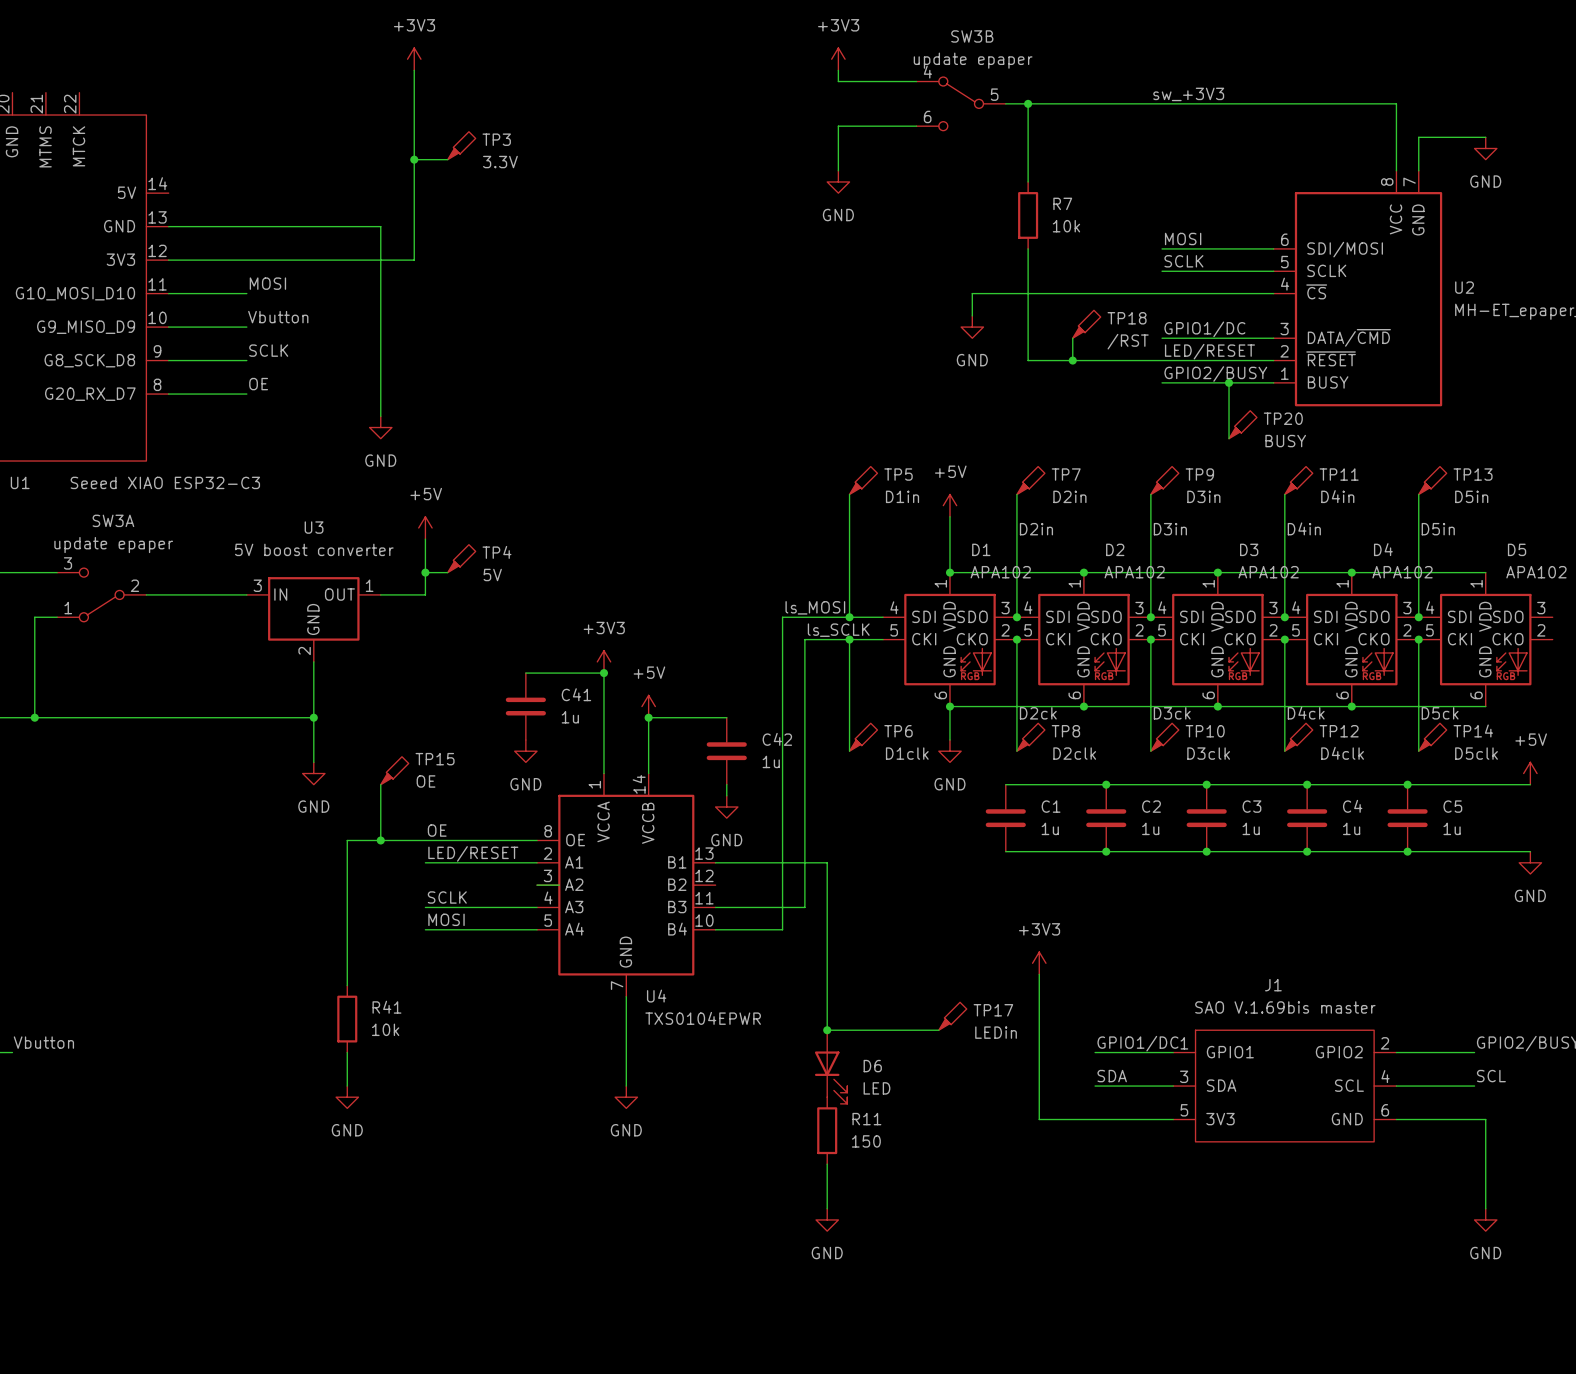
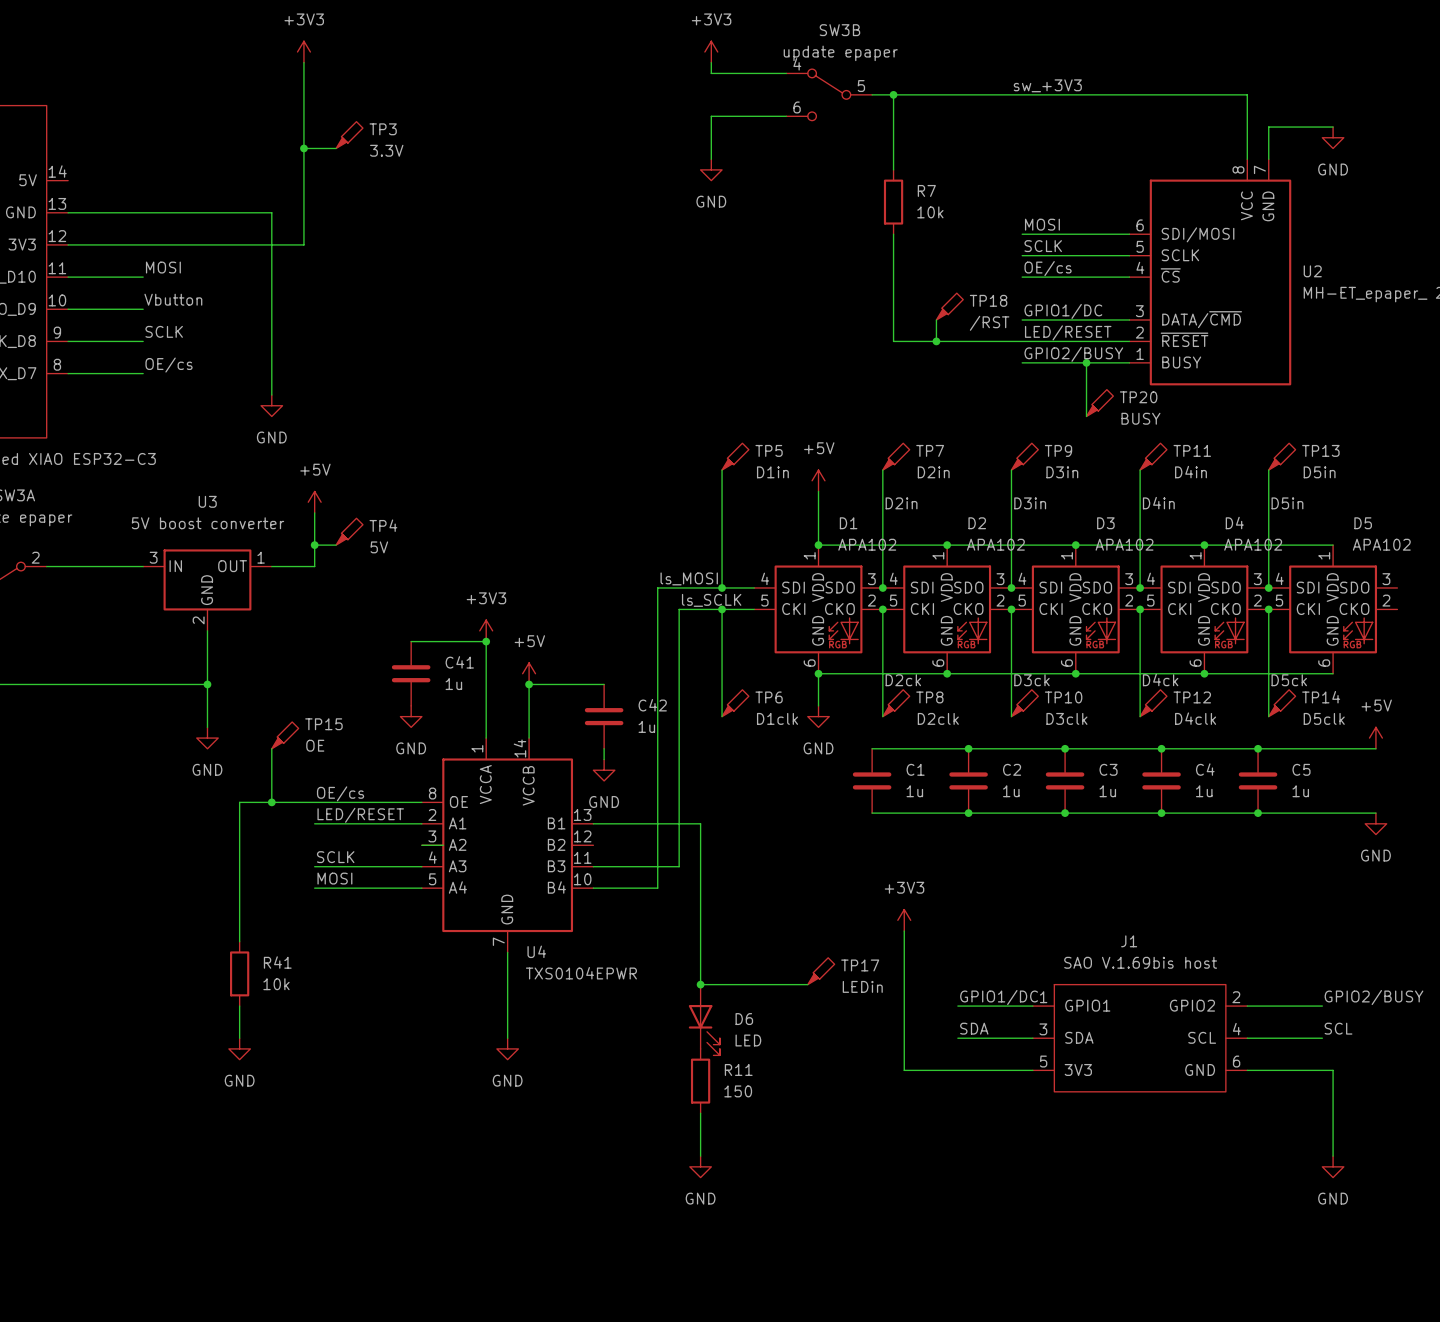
label: none -> OE/cs (1048, 268)
wire: (1162, 293) (972, 293) (972, 315) -> none
power symbol: GND (972, 327) -> none
label: OE (258, 384) -> OE/cs (169, 365)
label: OE (437, 830) -> OE/cs (340, 793)
J1 value: SAO V.1.69bis master (1285, 1007) -> SAO V.1.69bis host (1140, 962)

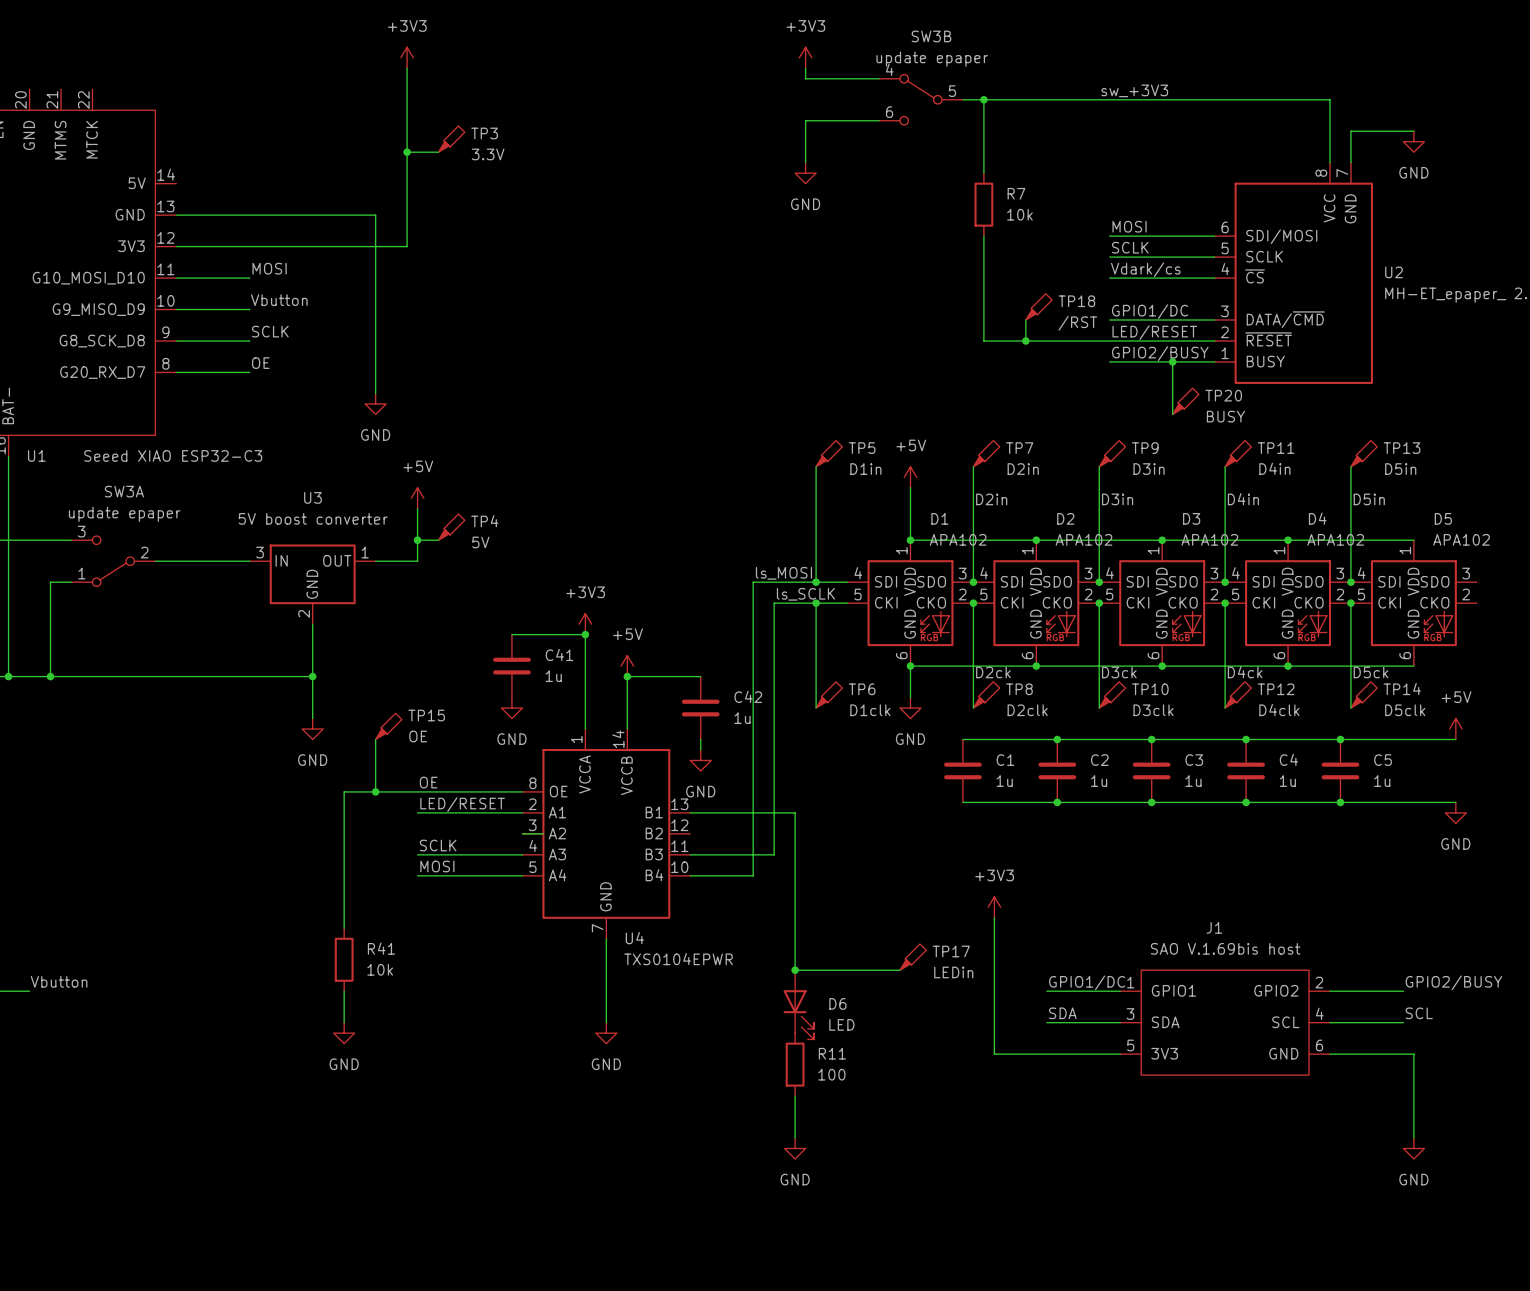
label: OE/cs (1048, 268) -> Vdark/cs (1145, 269)
label: OE/cs (169, 365) -> OE (260, 363)
label: OE/cs (340, 793) -> OE (428, 782)
R11 value: 150 (738, 1091) -> 100 (831, 1074)

